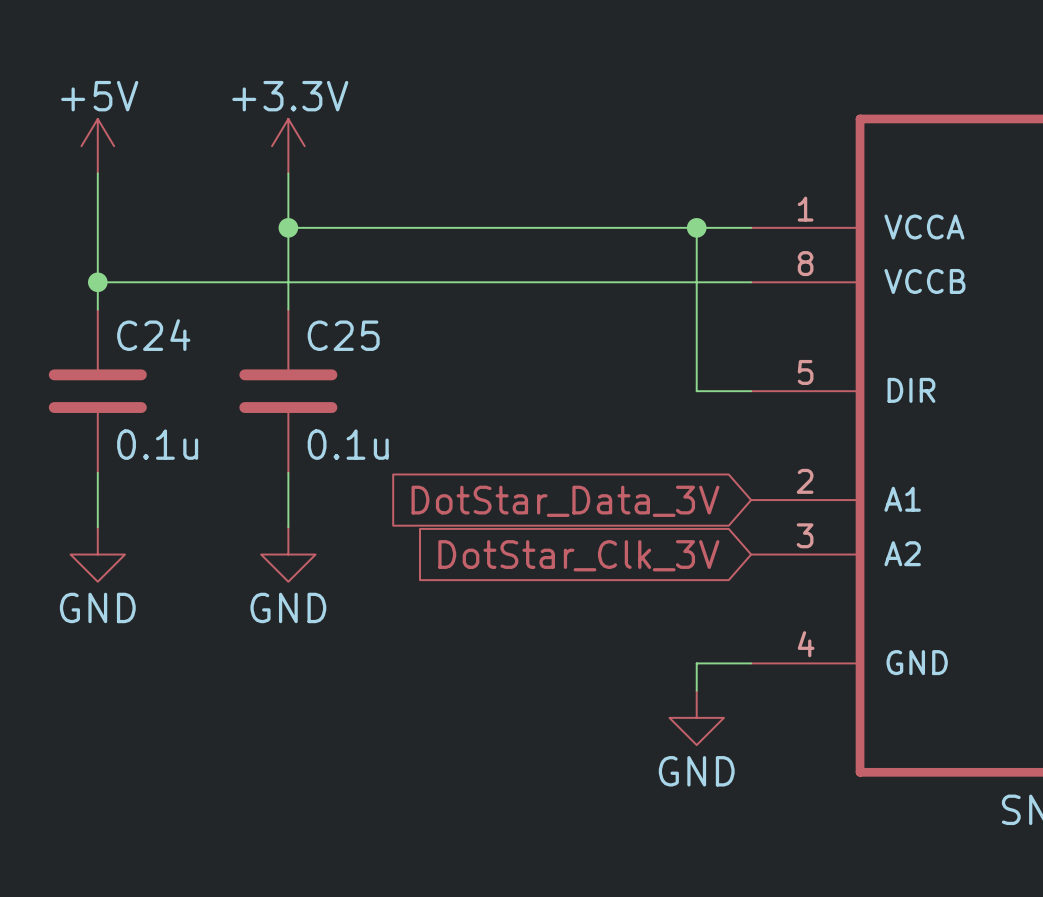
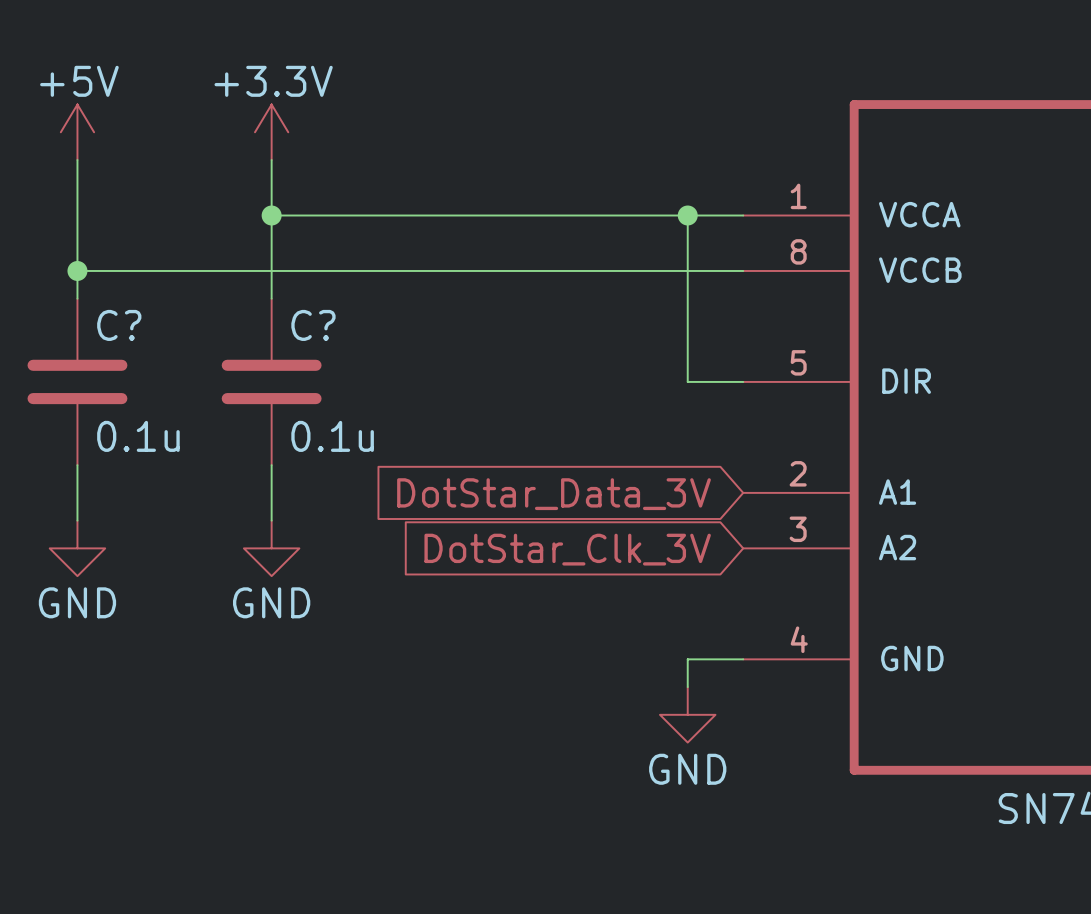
C24 name: C24 (153, 335) -> C? (119, 325)
C25 name: C25 (343, 335) -> C? (313, 325)

